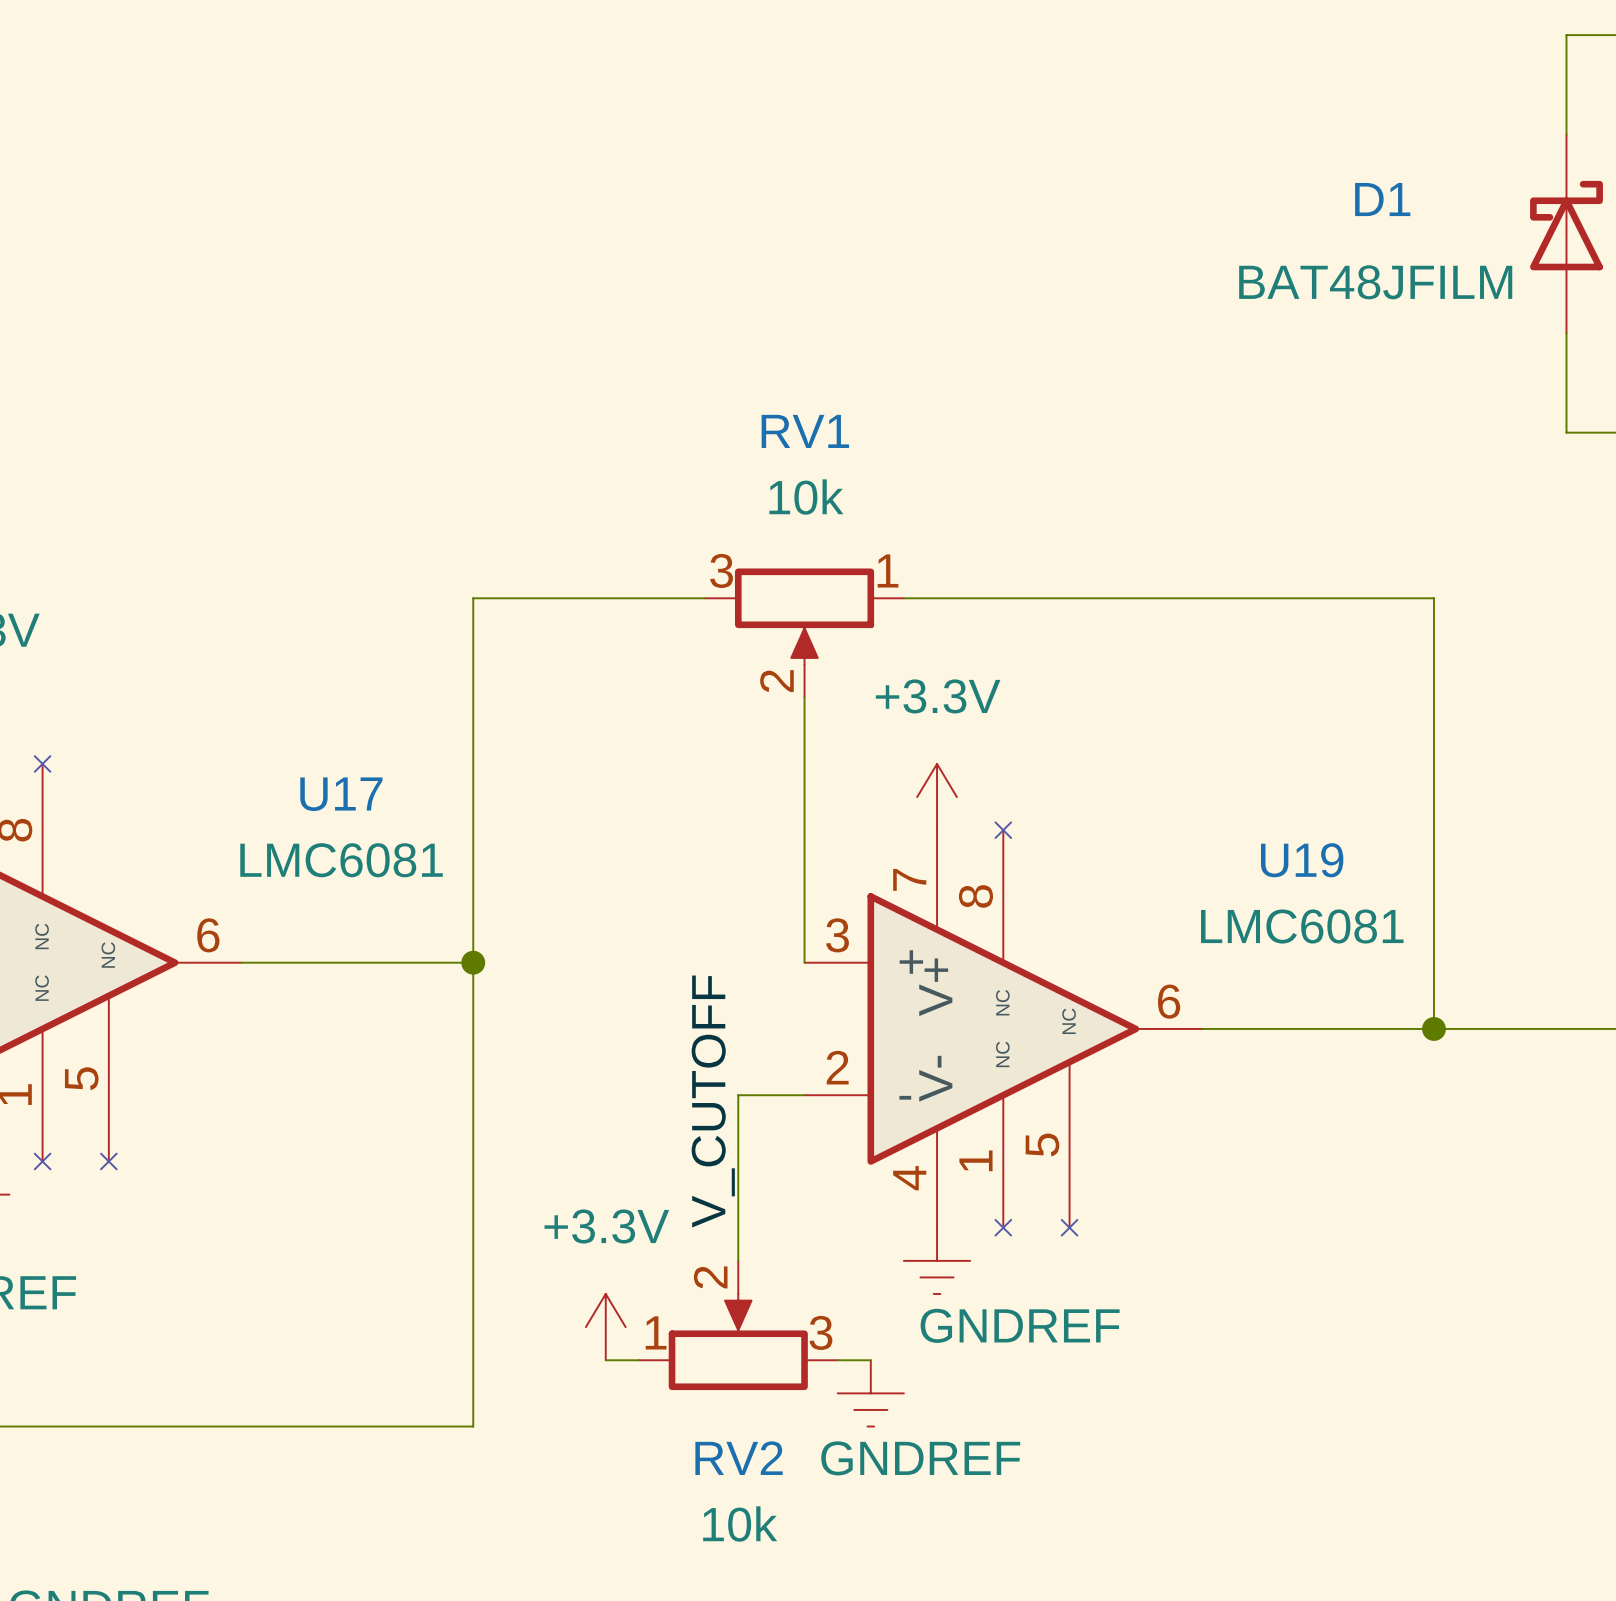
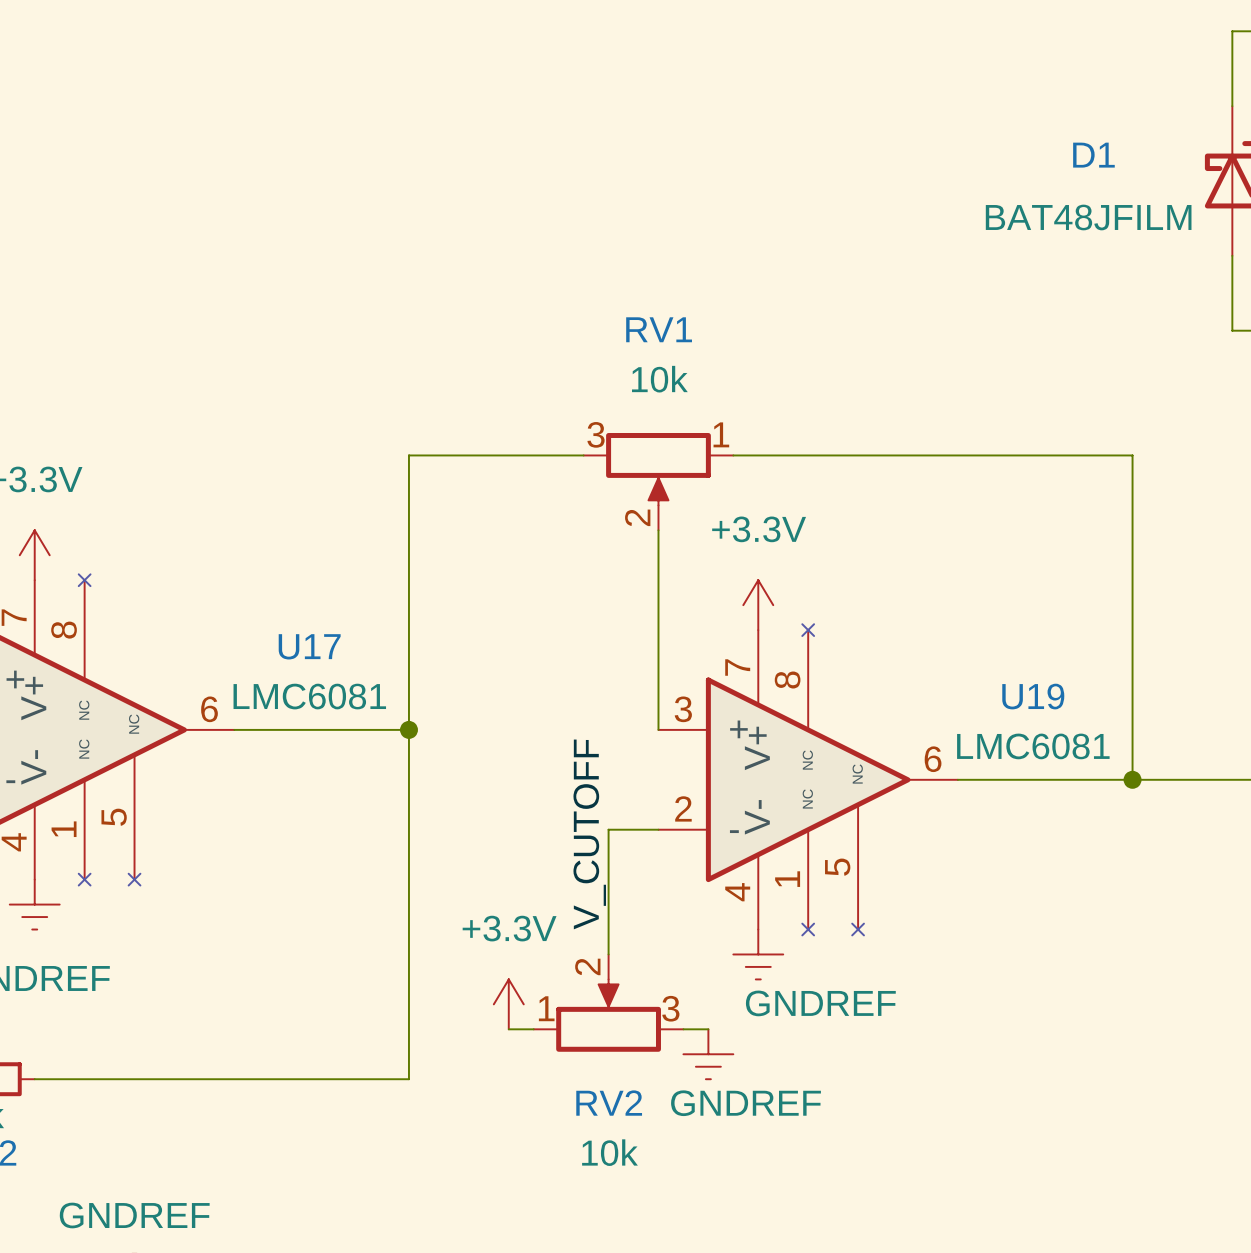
U17 name position: U17 (341, 794) -> U17 (309, 646)
U17 value position: LMC6081 (341, 860) -> LMC6081 (309, 696)
U19 name position: U19 (1302, 860) -> U19 (1033, 696)
U19 value position: LMC6081 (1302, 926) -> LMC6081 (1033, 746)

